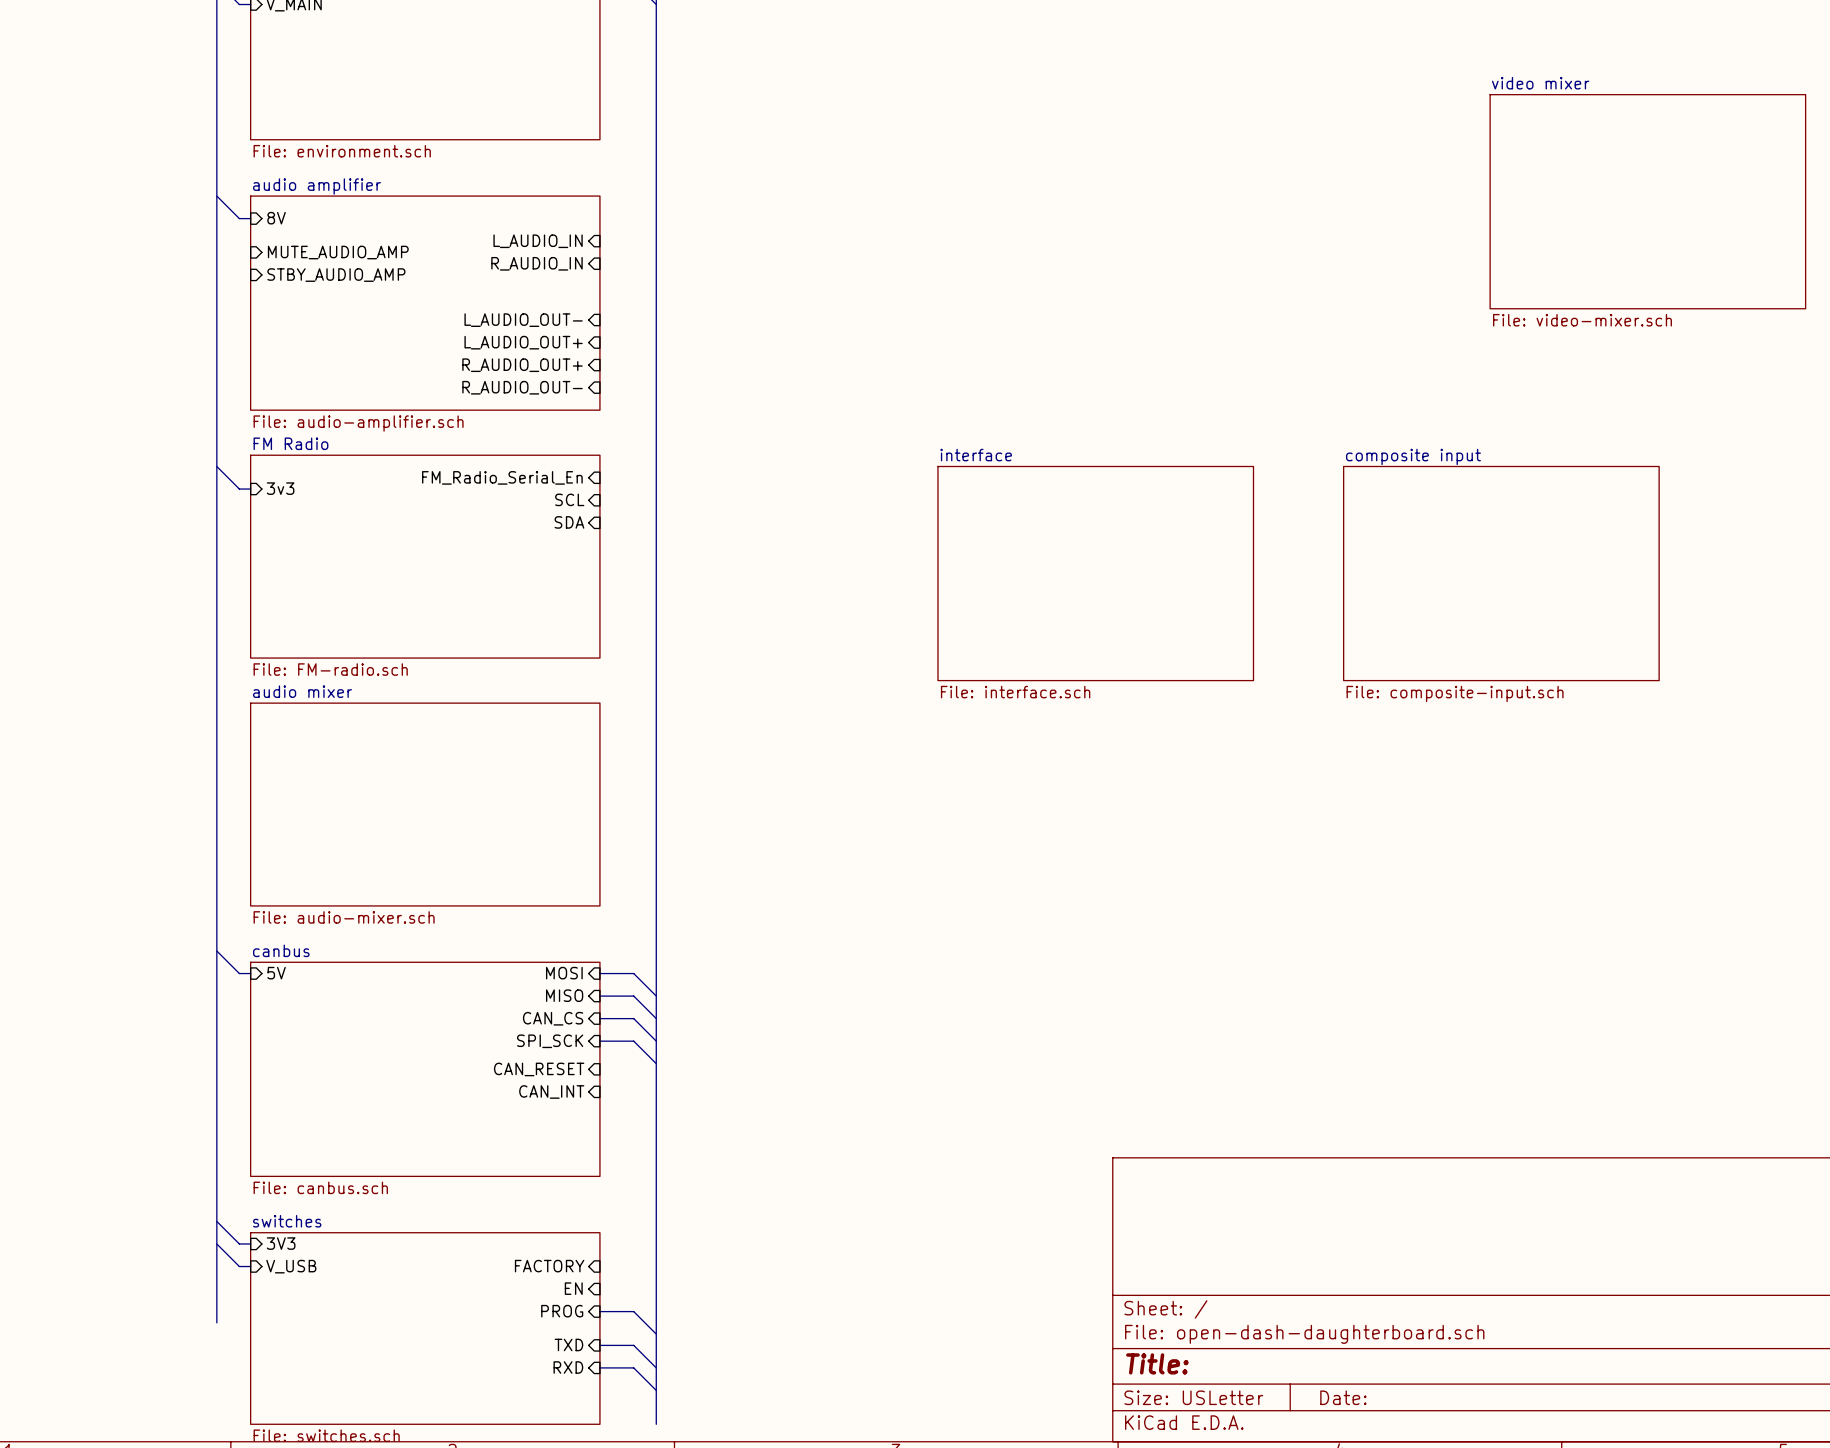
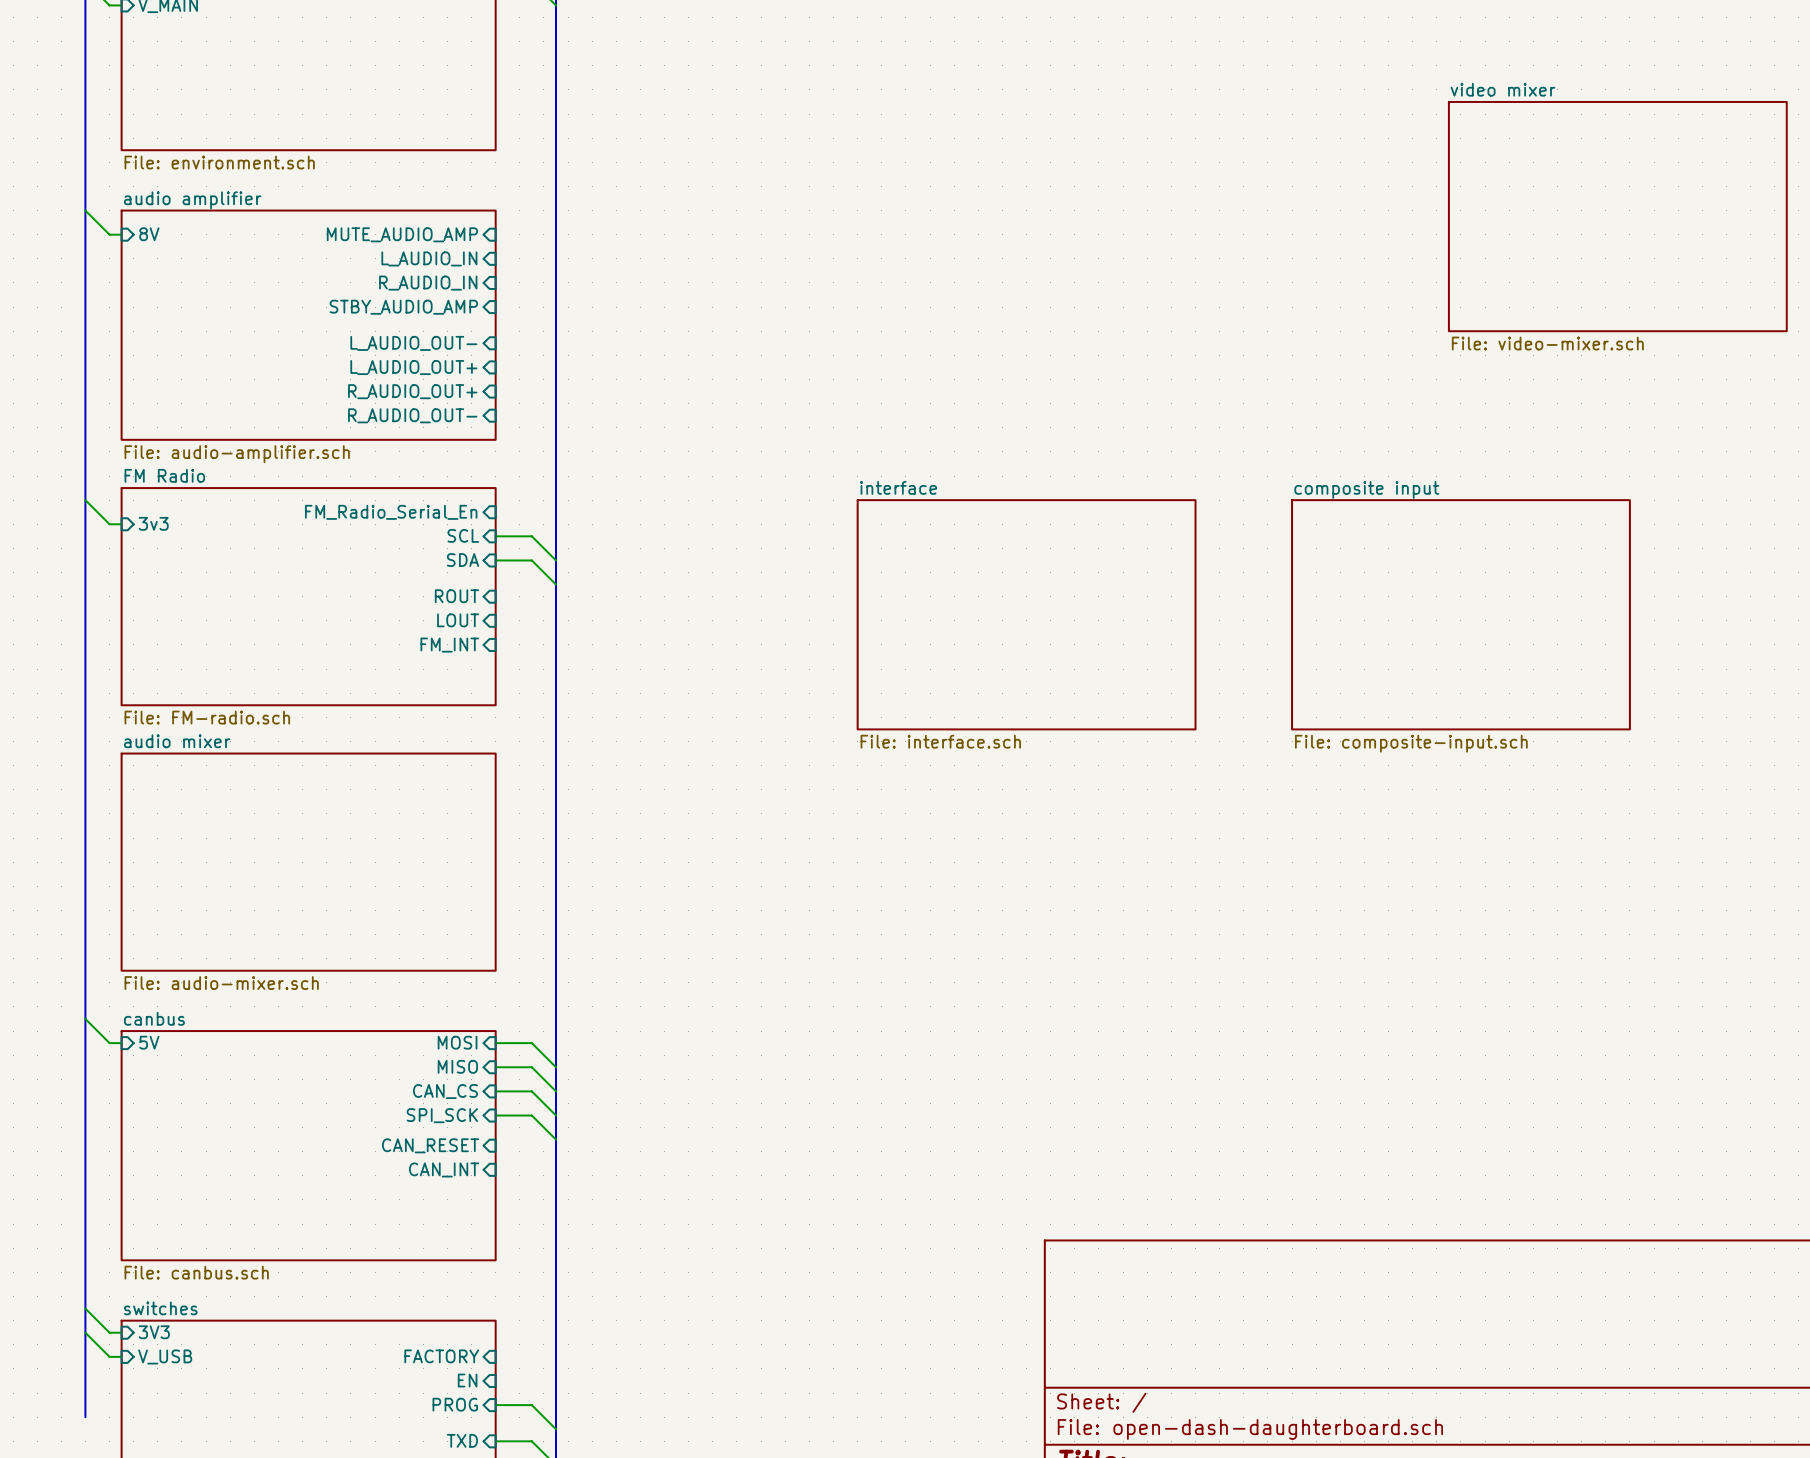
sheet pin: none -> MUTE_AUDIO_AMP (402, 234)
sheet pin: MUTE_AUDIO_AMP (338, 252) -> none
sheet pin: STBY_AUDIO_AMP (336, 275) -> none
sheet pin: none -> STBY_AUDIO_AMP (403, 307)
wire: none -> (495, 536) (531, 536) (556, 560)
wire: none -> (495, 560) (531, 560) (556, 584)
sheet pin: none -> ROUT (456, 596)
sheet pin: none -> LOUT (458, 620)
sheet pin: none -> FM_INT (449, 645)

